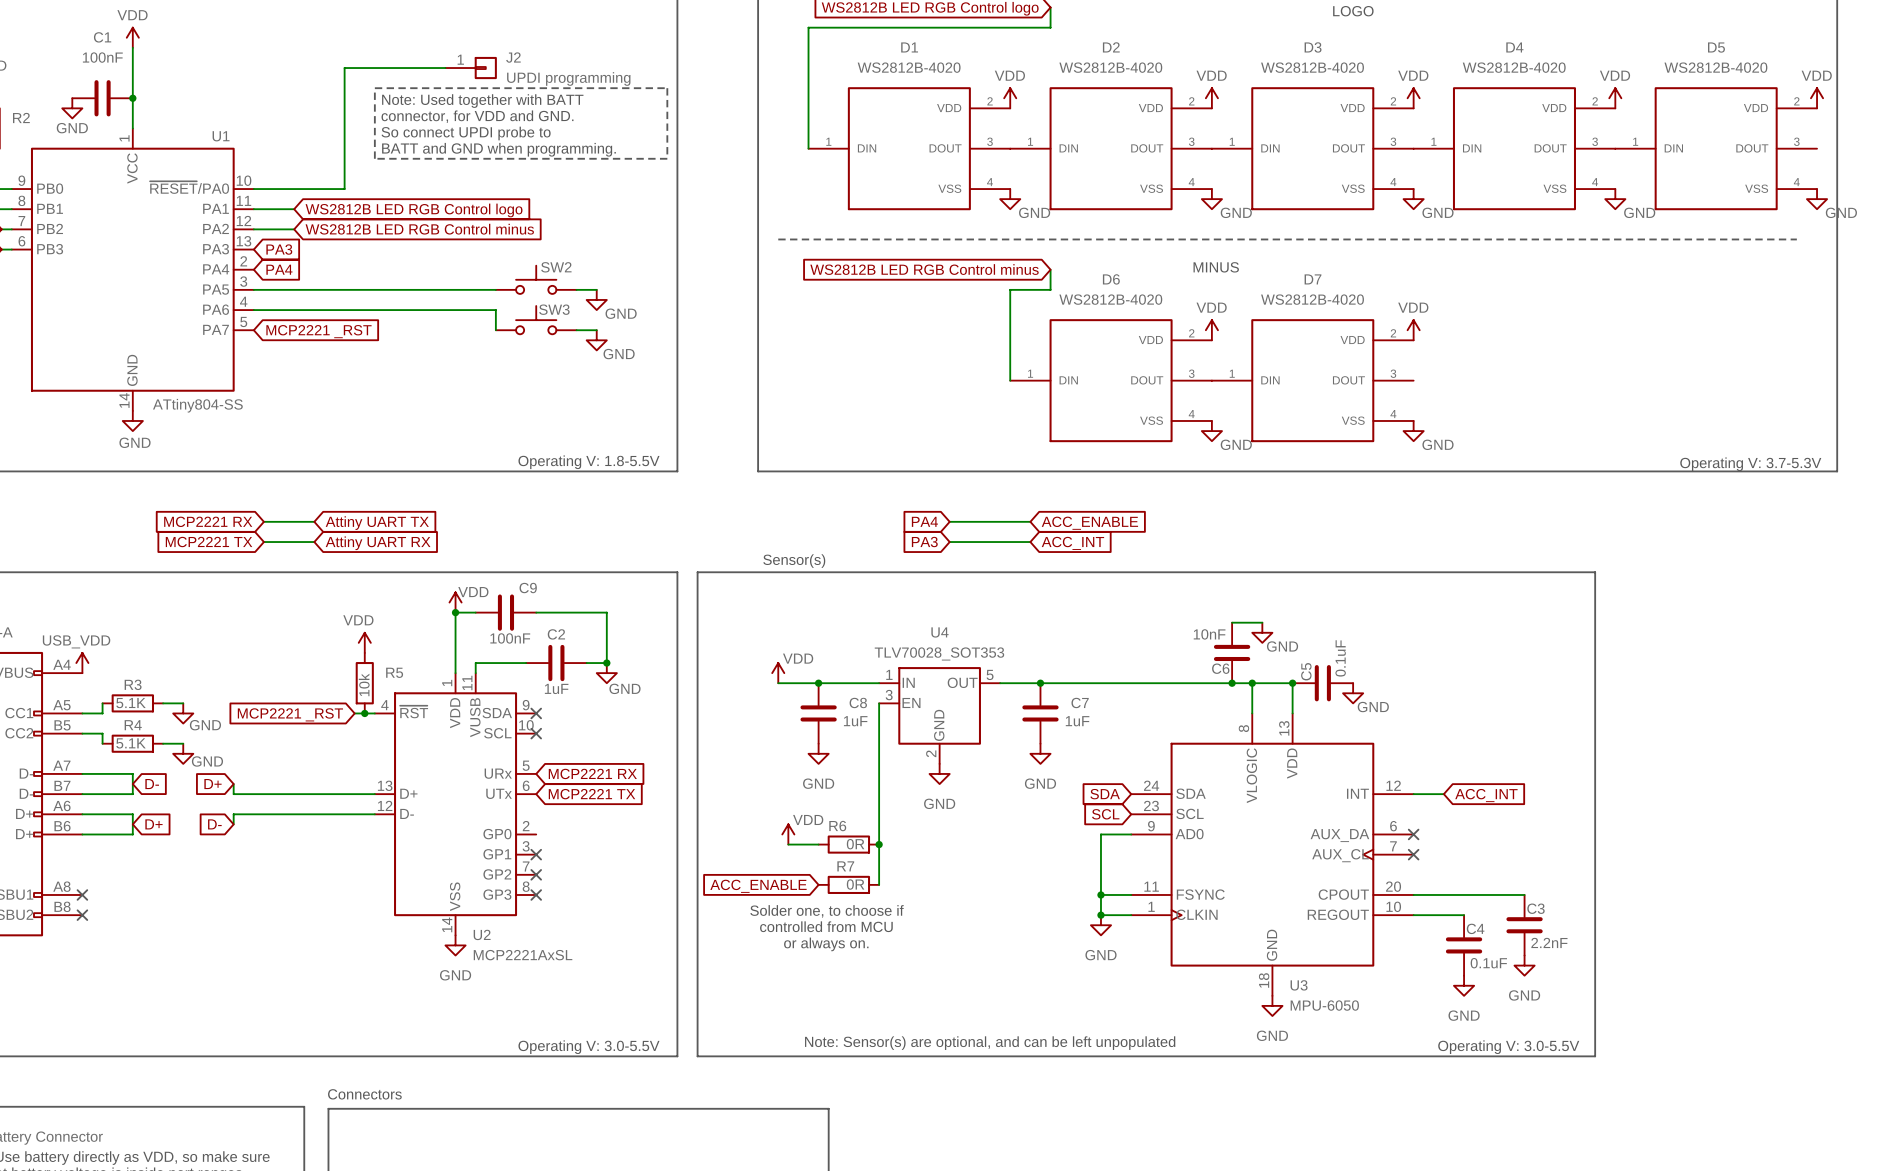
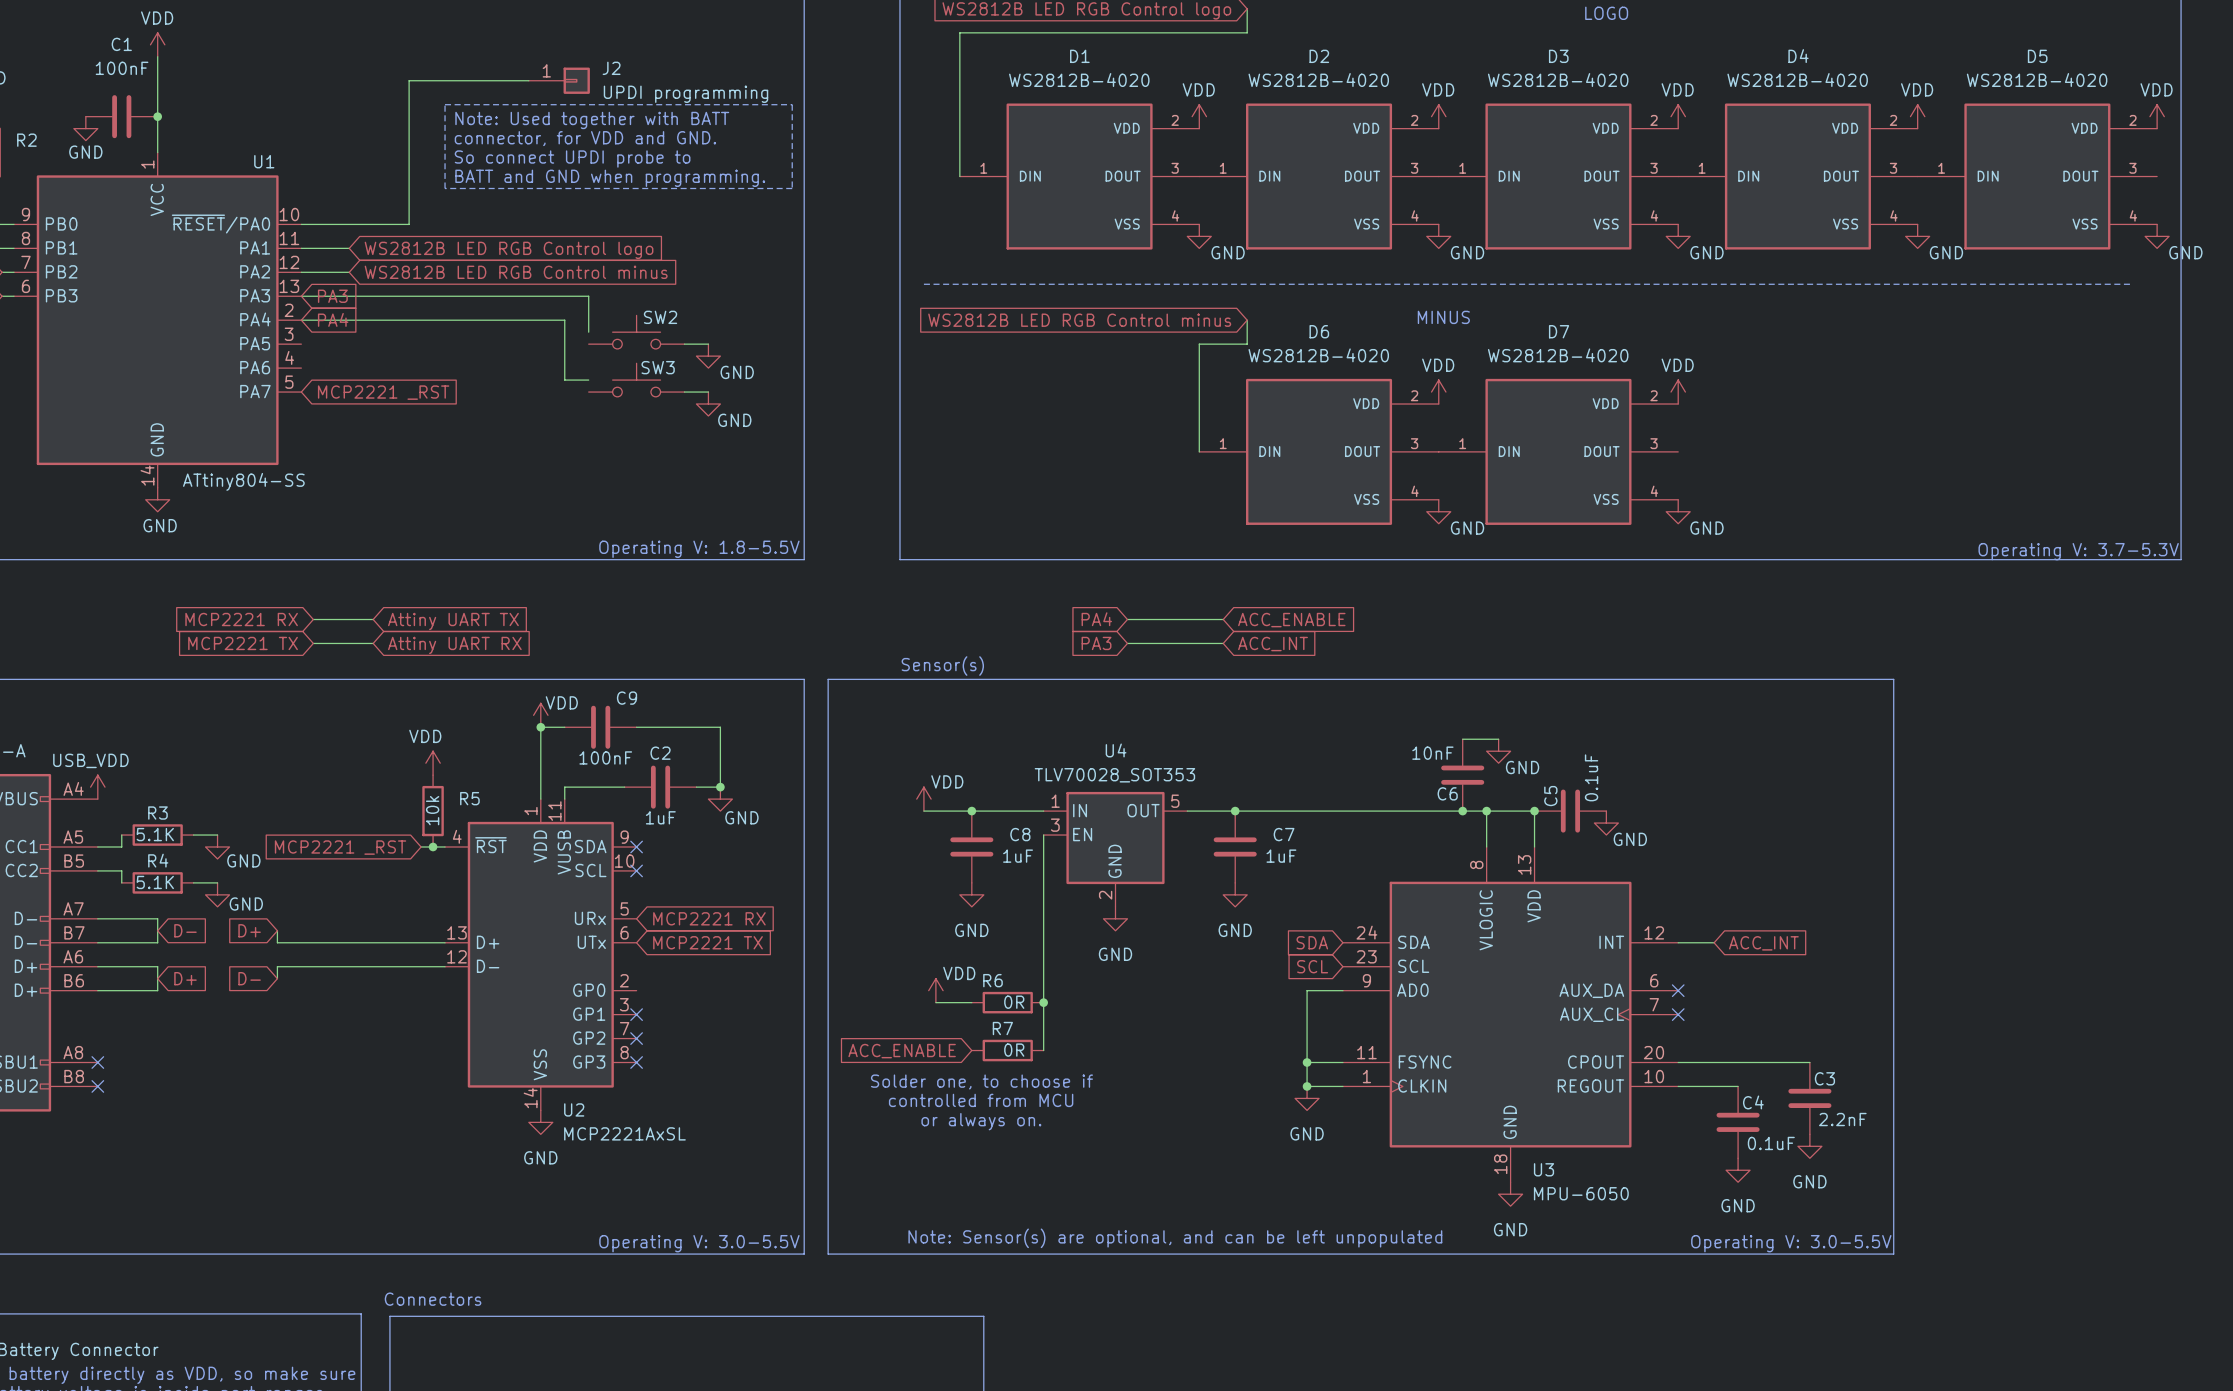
wire: none -> (301, 296) (588, 296) (588, 332)
wire: none -> (301, 320) (564, 320) (564, 380) (588, 380)
wire: (253, 289) (495, 289) -> none
wire: (253, 310) (495, 310) (495, 330) -> none

